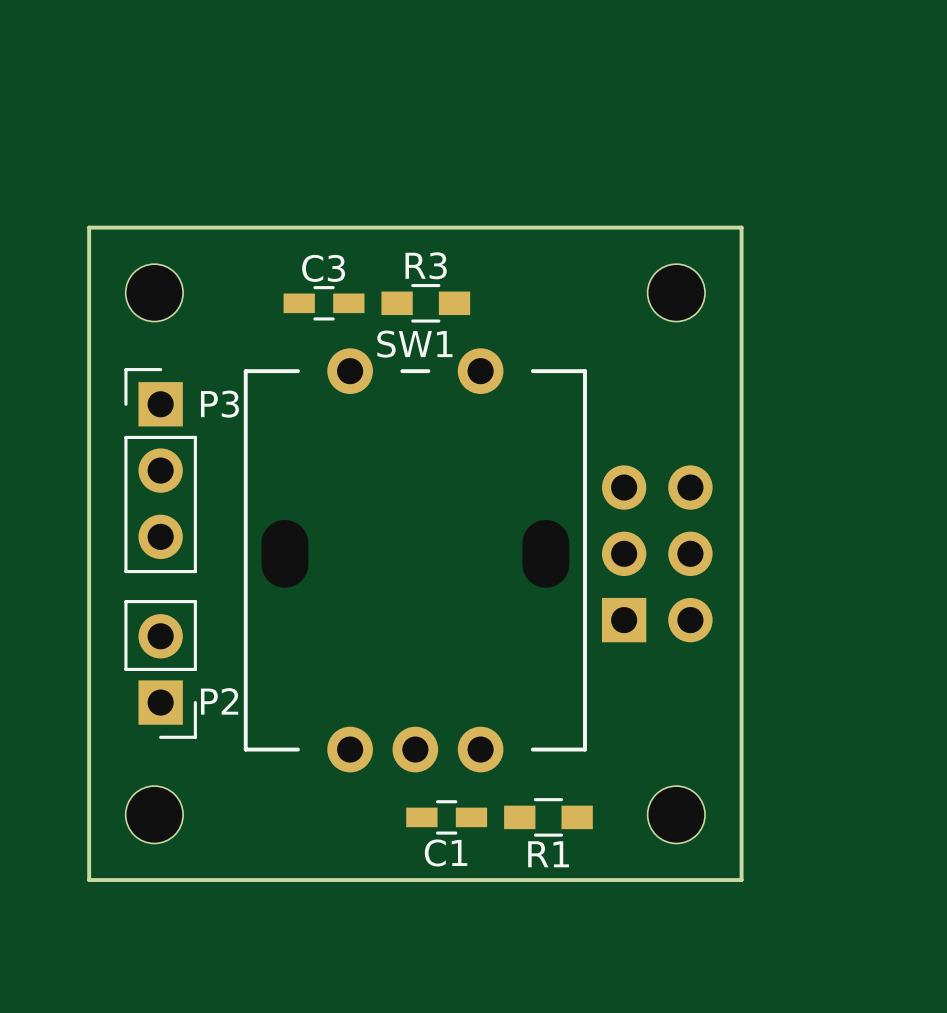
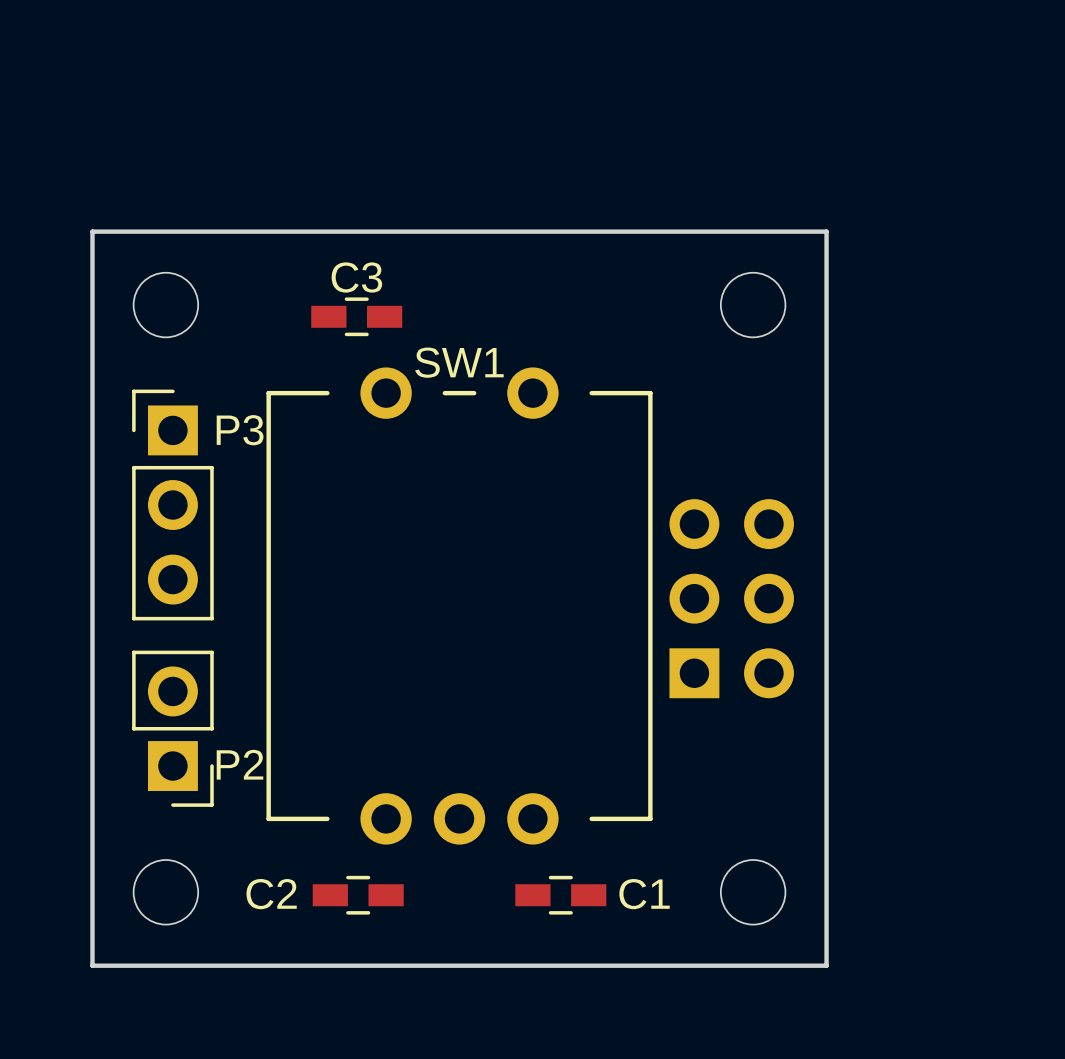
R3: (425, 303) -> none
C2: none -> (358, 895)
C1 position: (446, 817) -> (560, 895)
R1: (548, 817) -> none
C1 name position: C1 (446, 852) -> C1 (644, 894)

